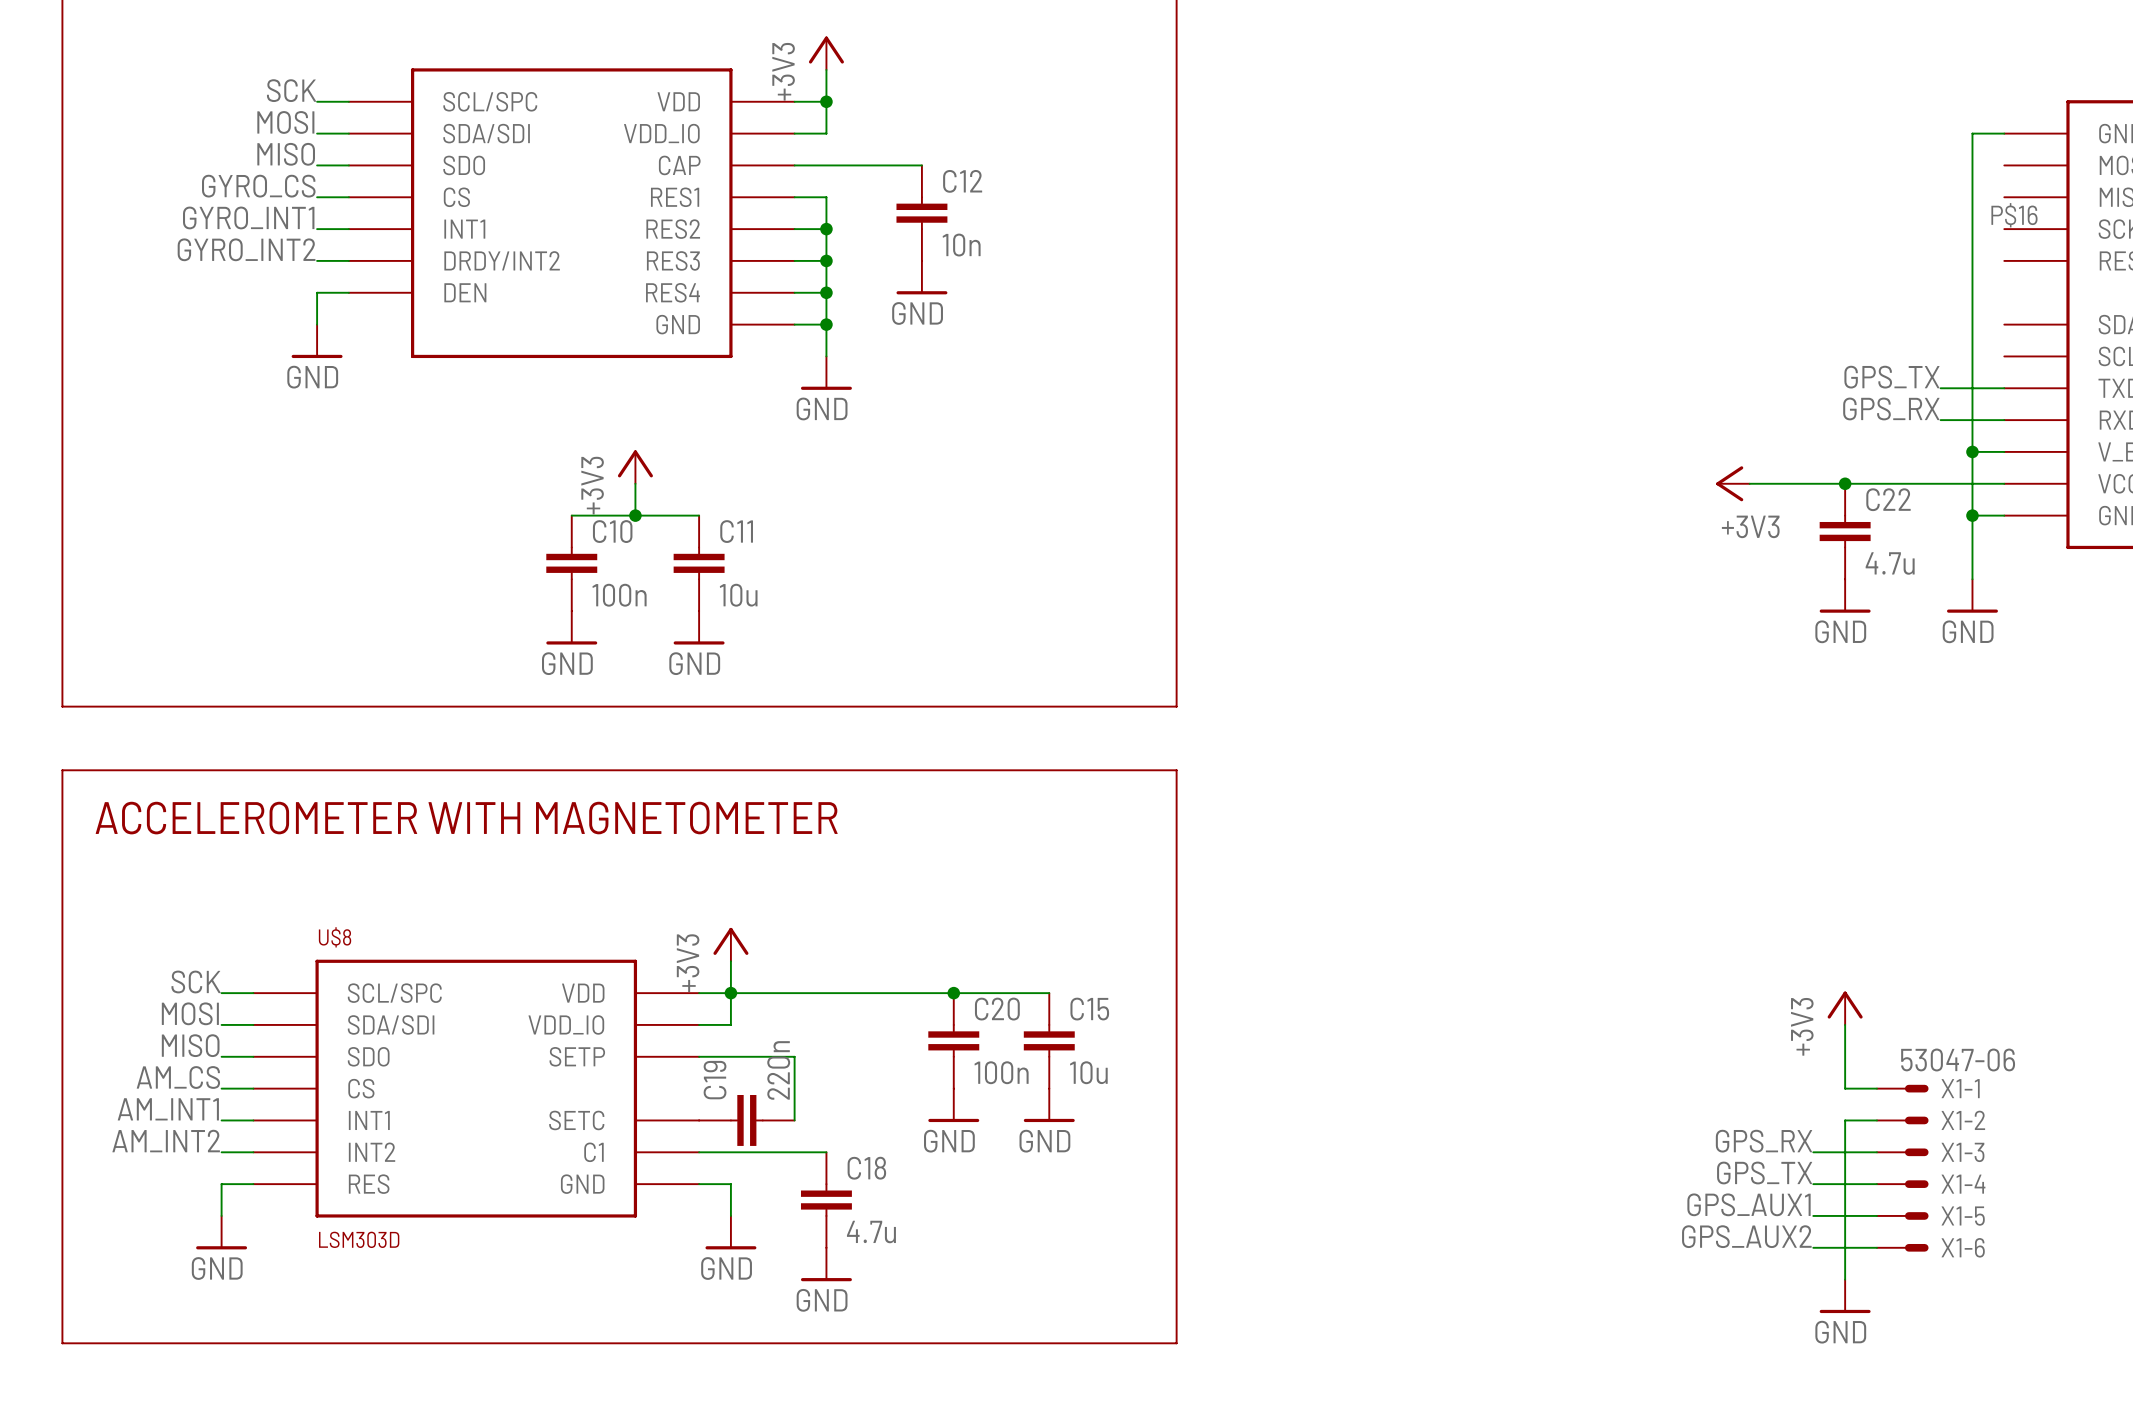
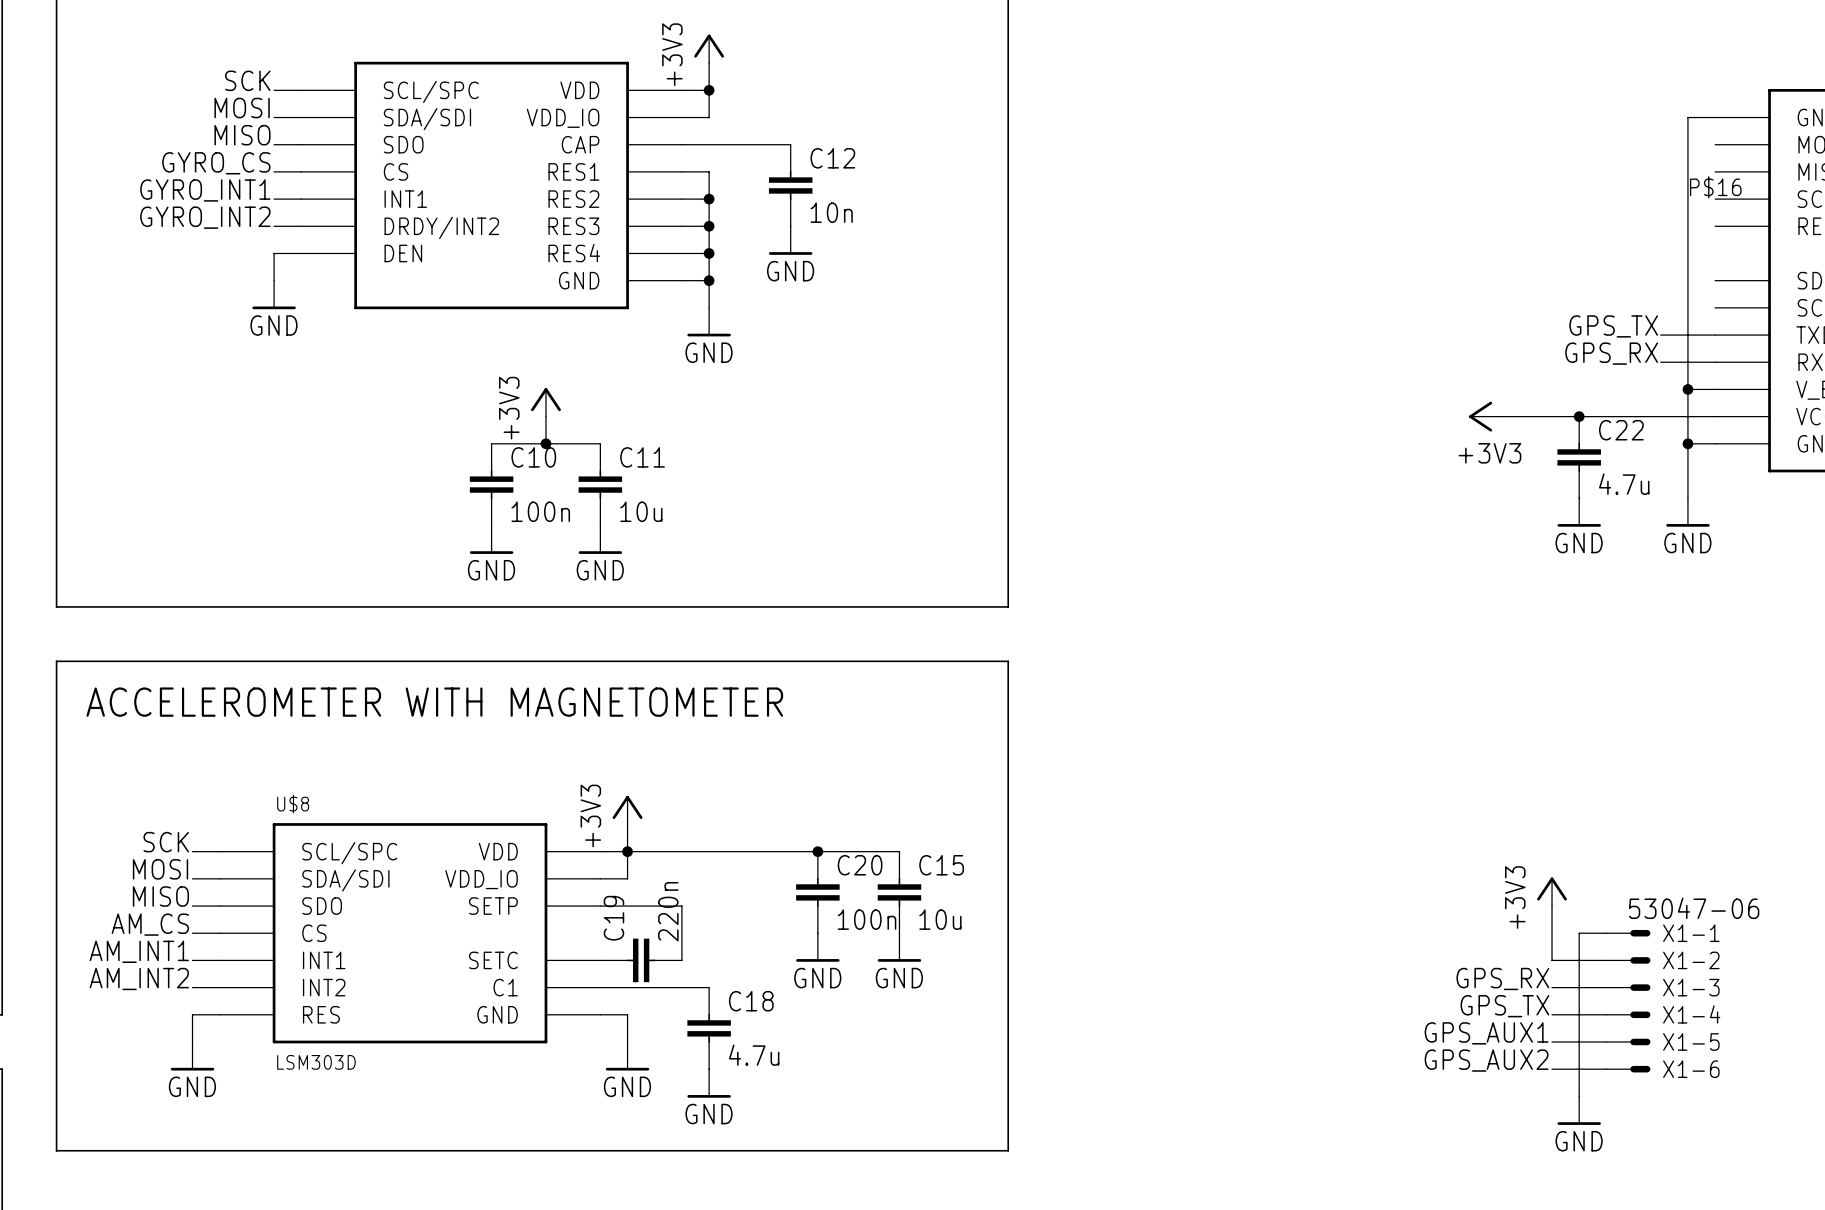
power symbol position: +3V3 (1845, 1008) -> +3V3 (1552, 891)
wire: (1845, 1024) (1845, 1088) -> (1552, 906) (1552, 960) (1579, 960) (1579, 933)

